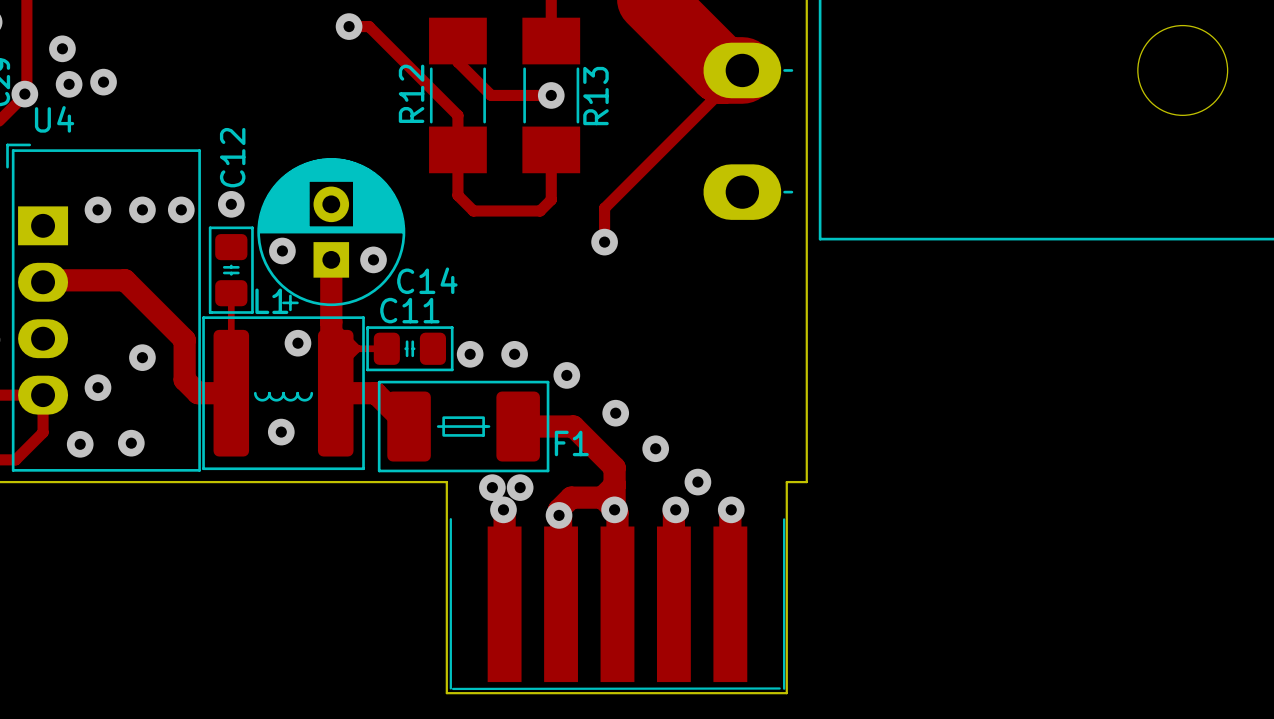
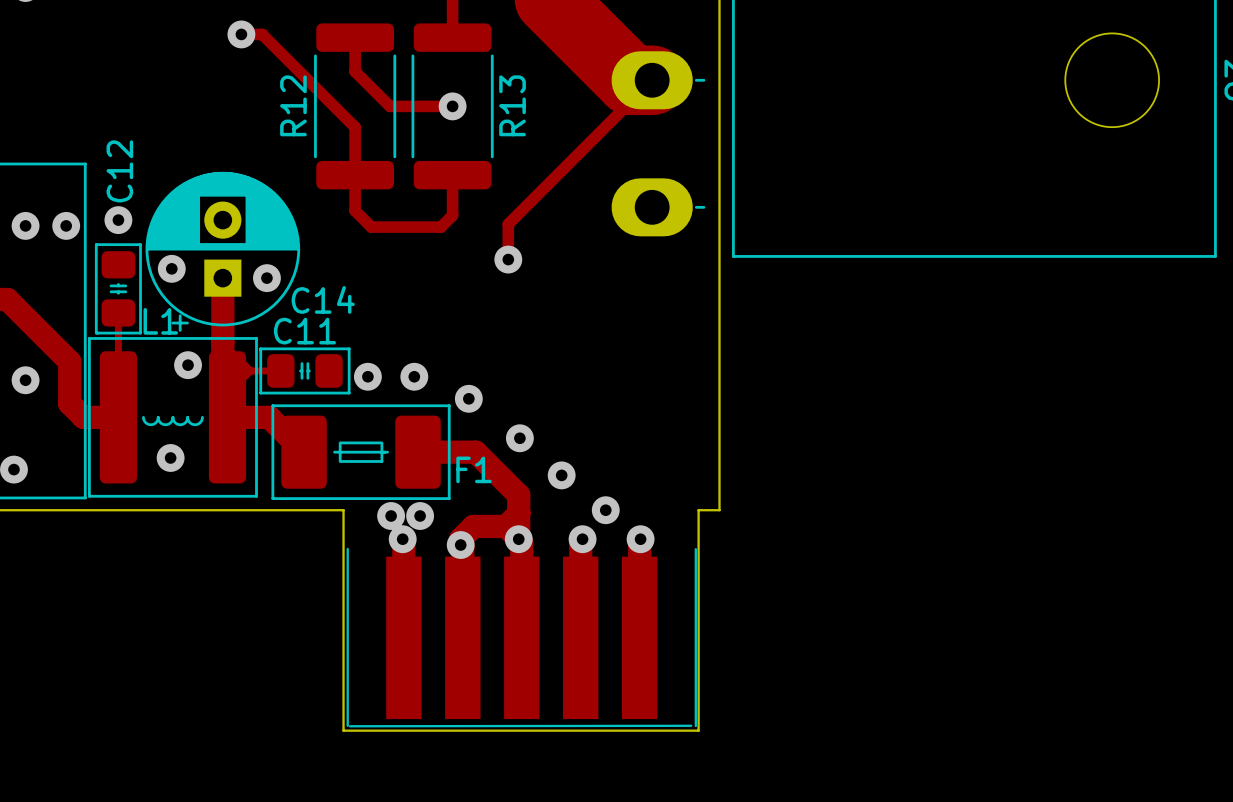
R12 footprint: [429, 17, 487, 174] -> [314, 23, 397, 190]
R13 footprint: [522, 17, 581, 174] -> [411, 23, 494, 190]

